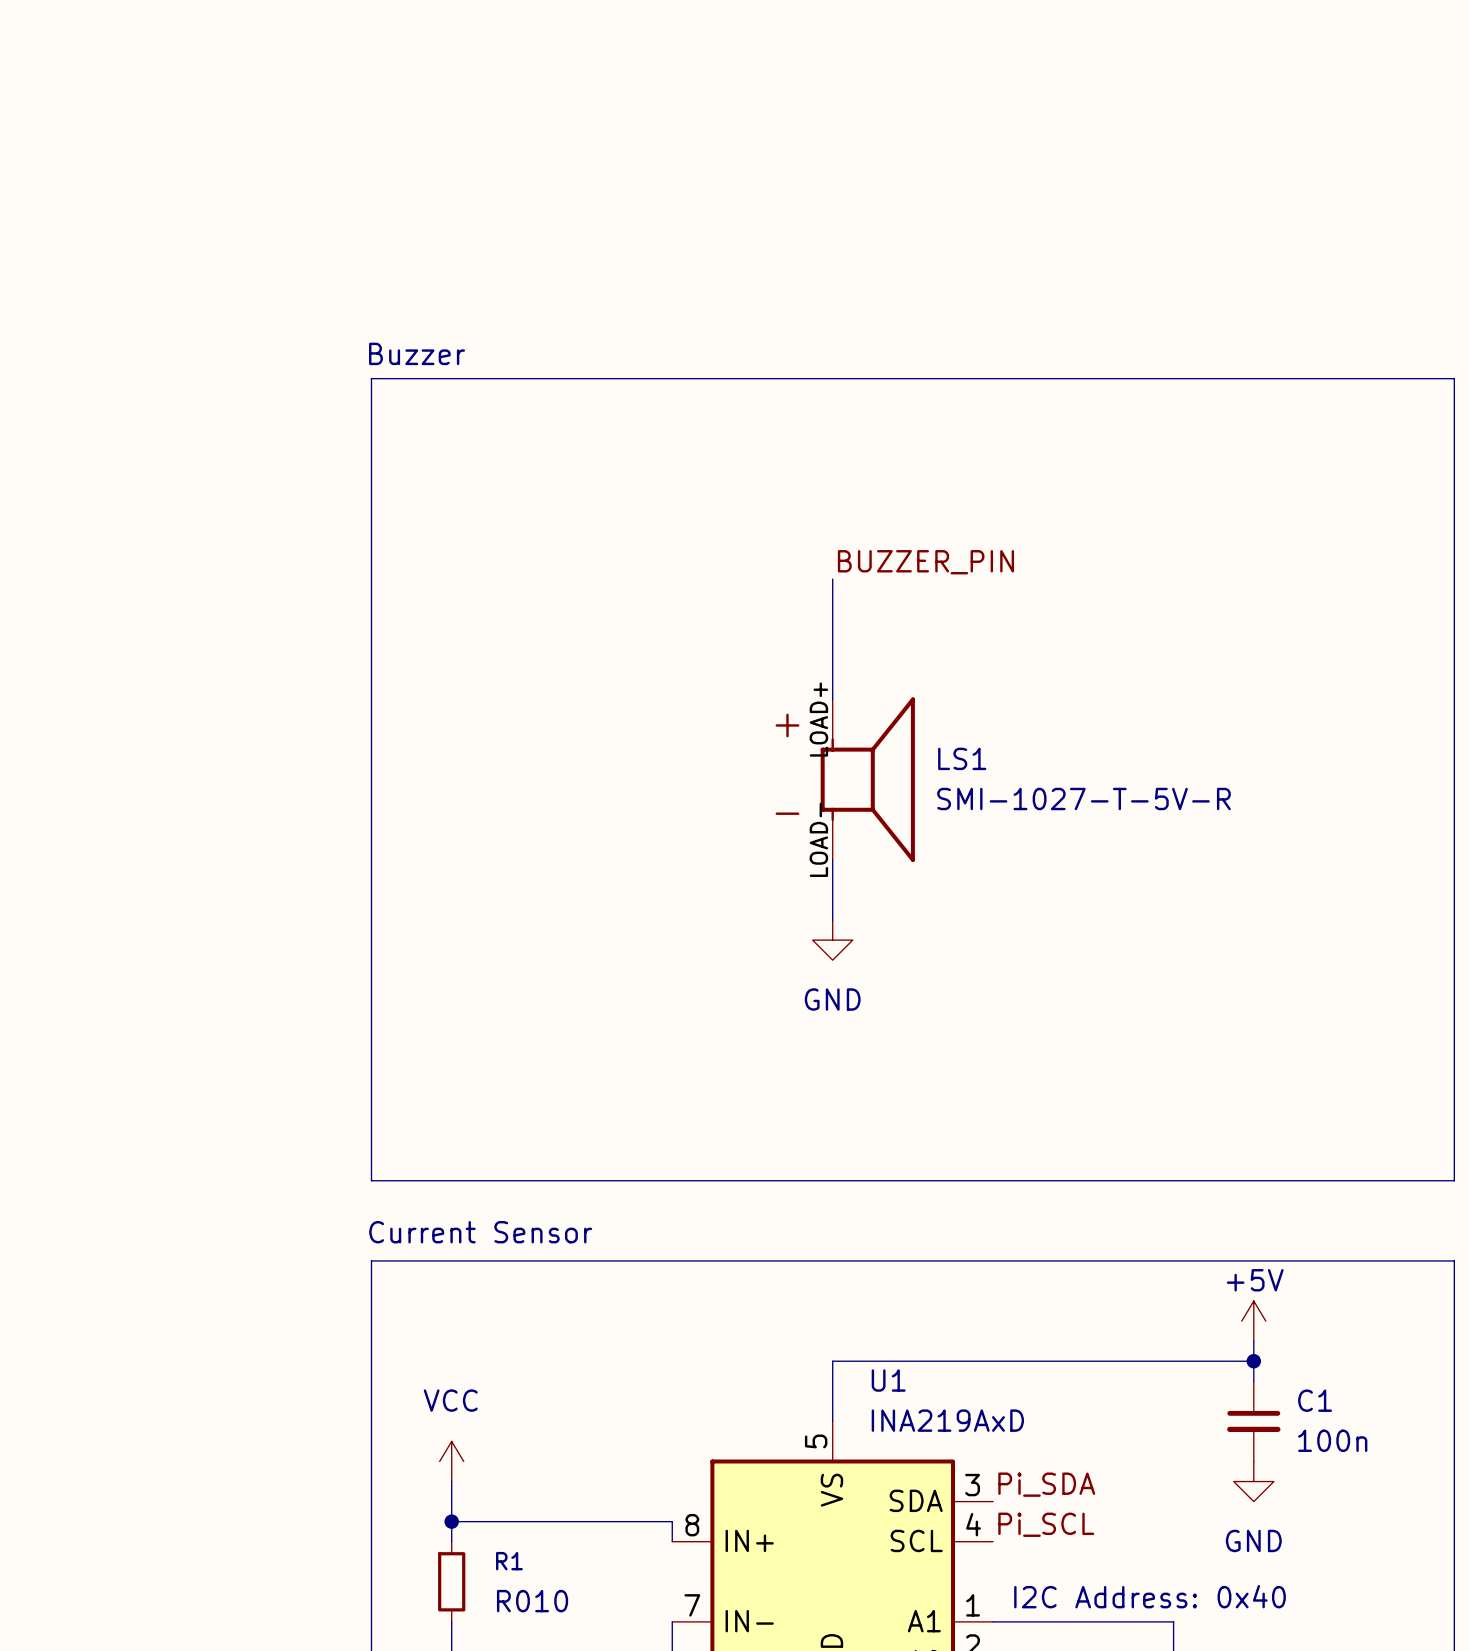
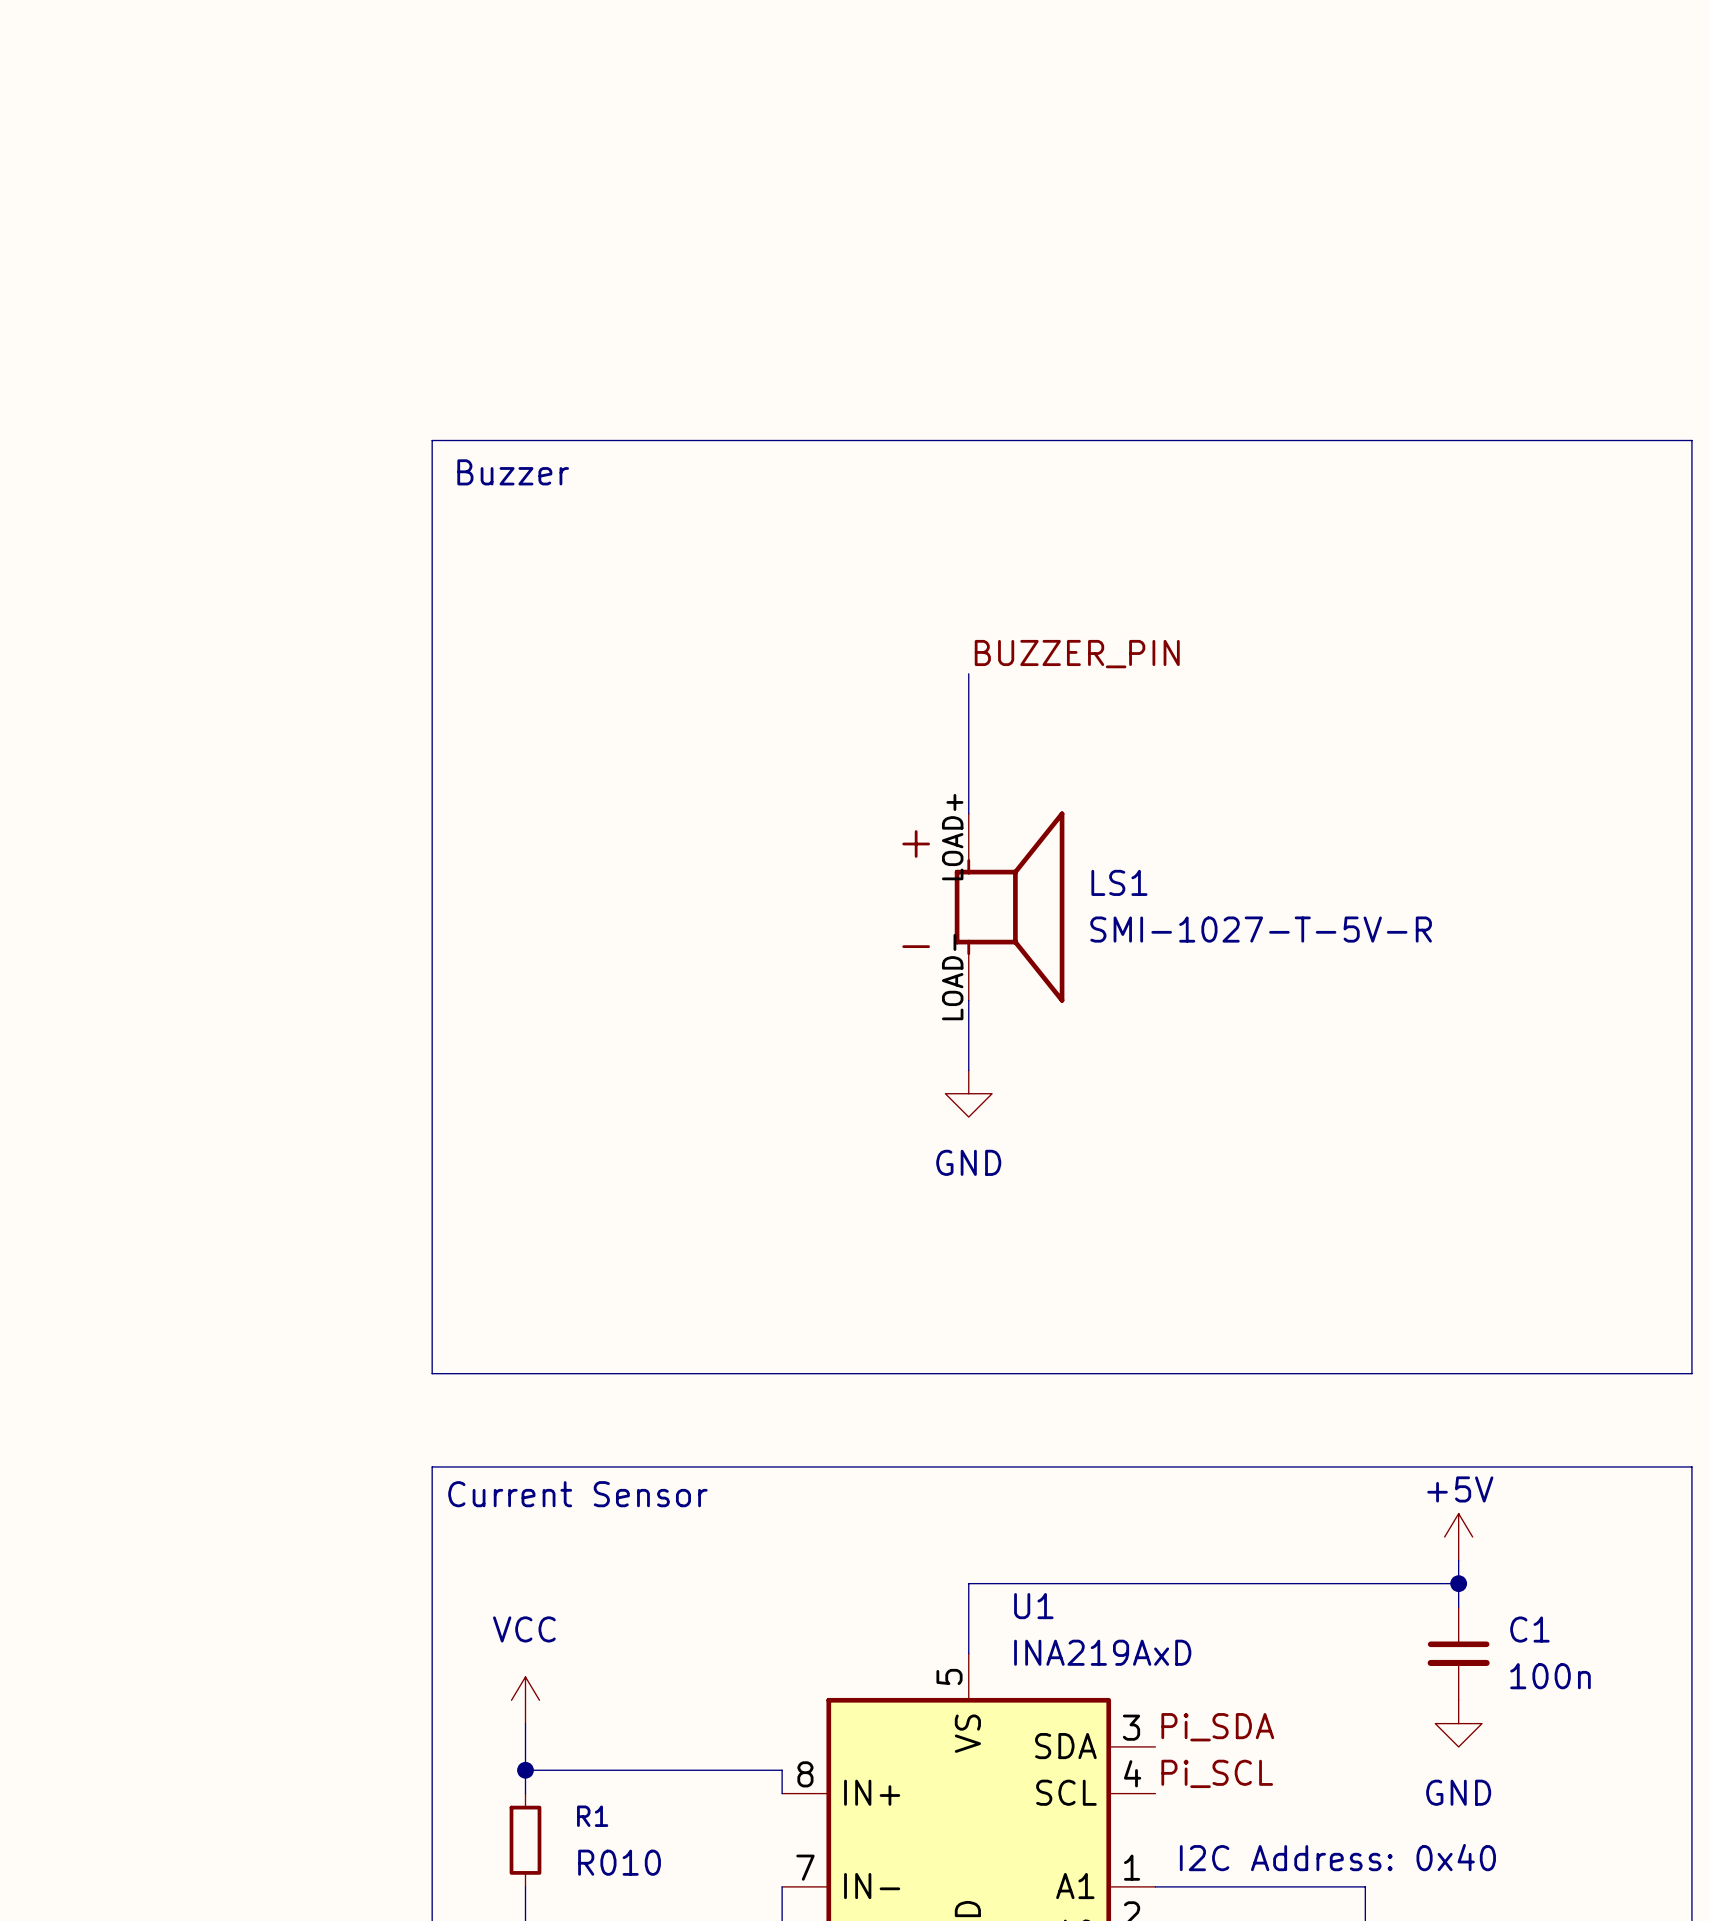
text position: Buzzer (417, 353) -> Buzzer (513, 472)
text position: Current Sensor (480, 1232) -> Current Sensor (577, 1494)

